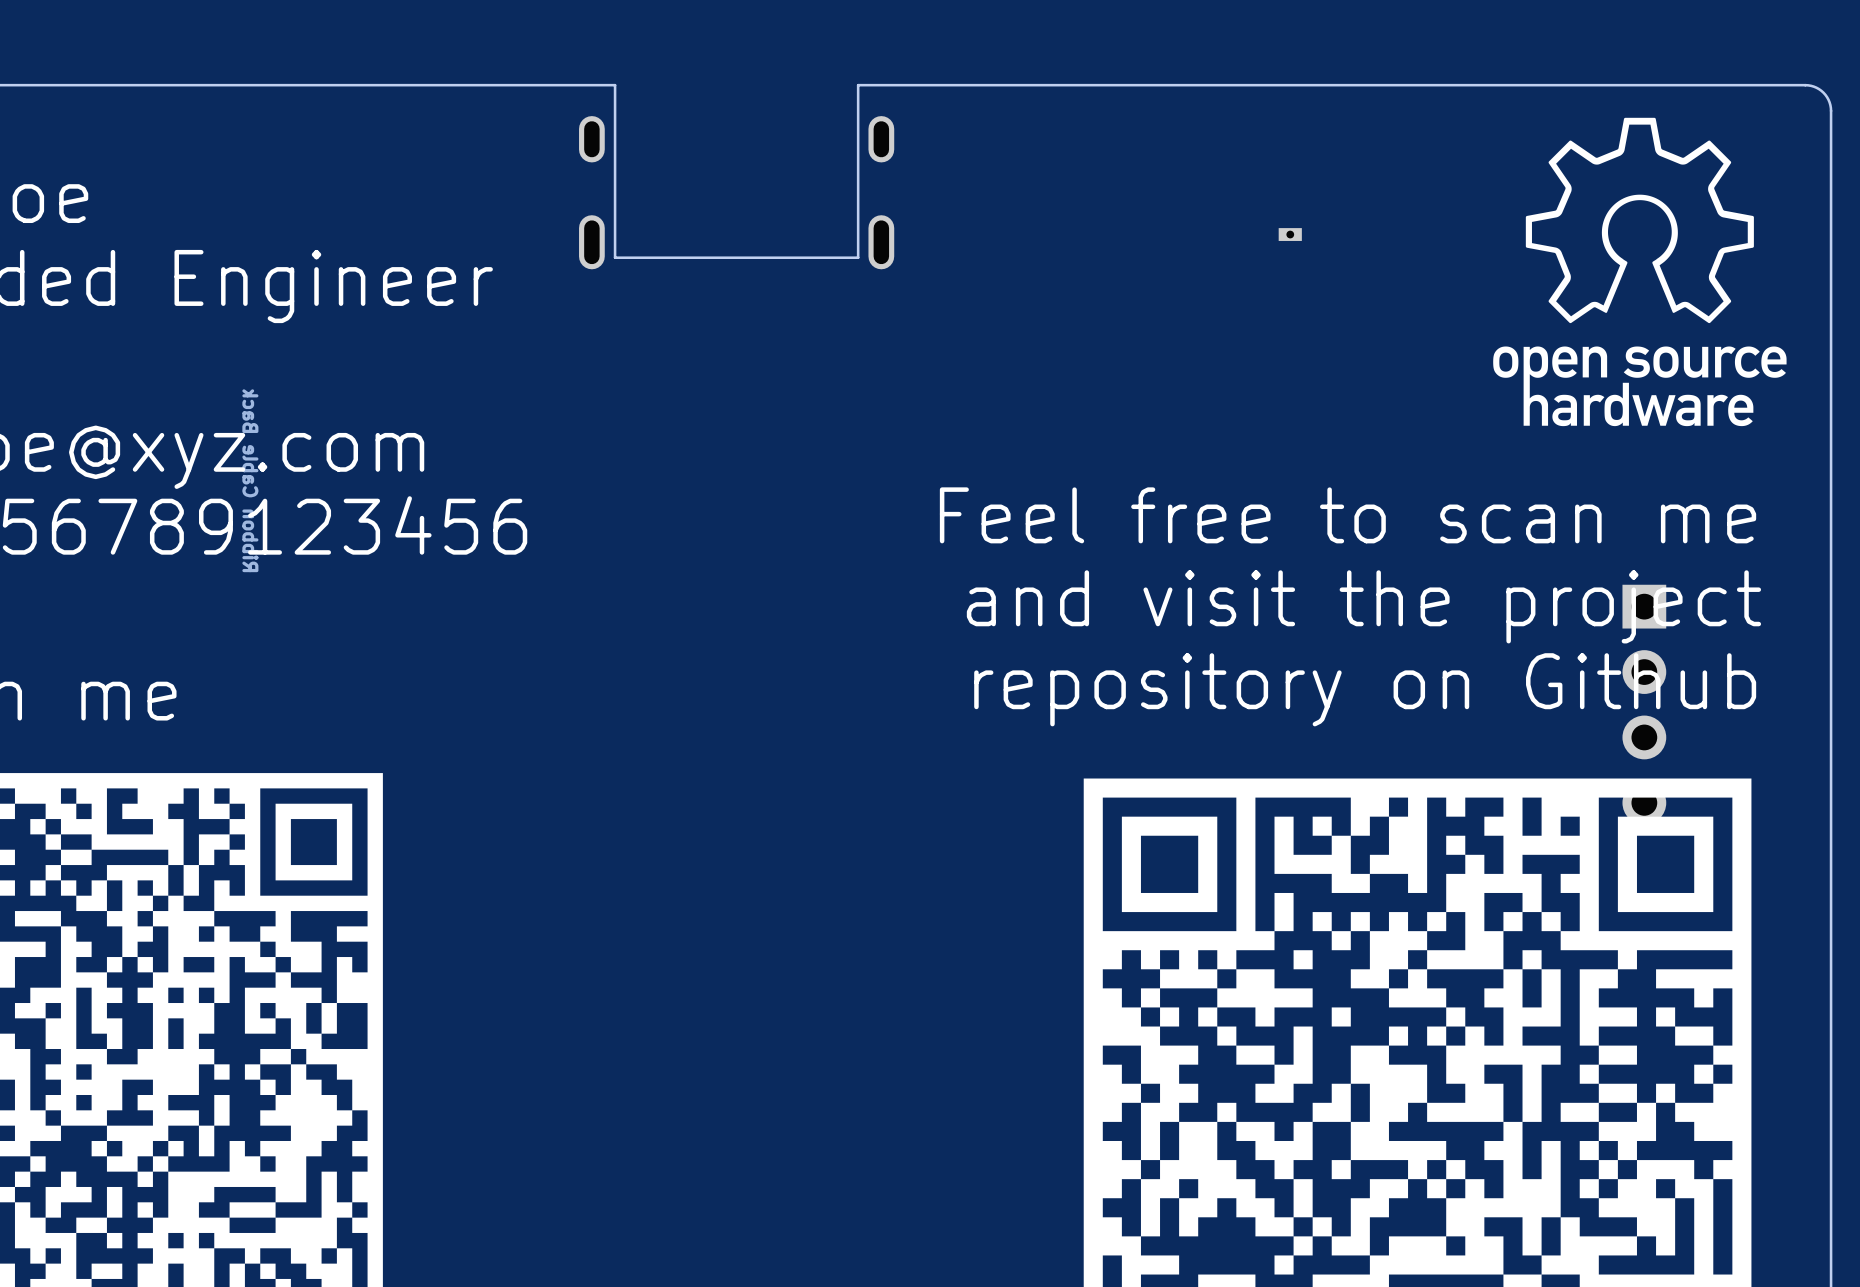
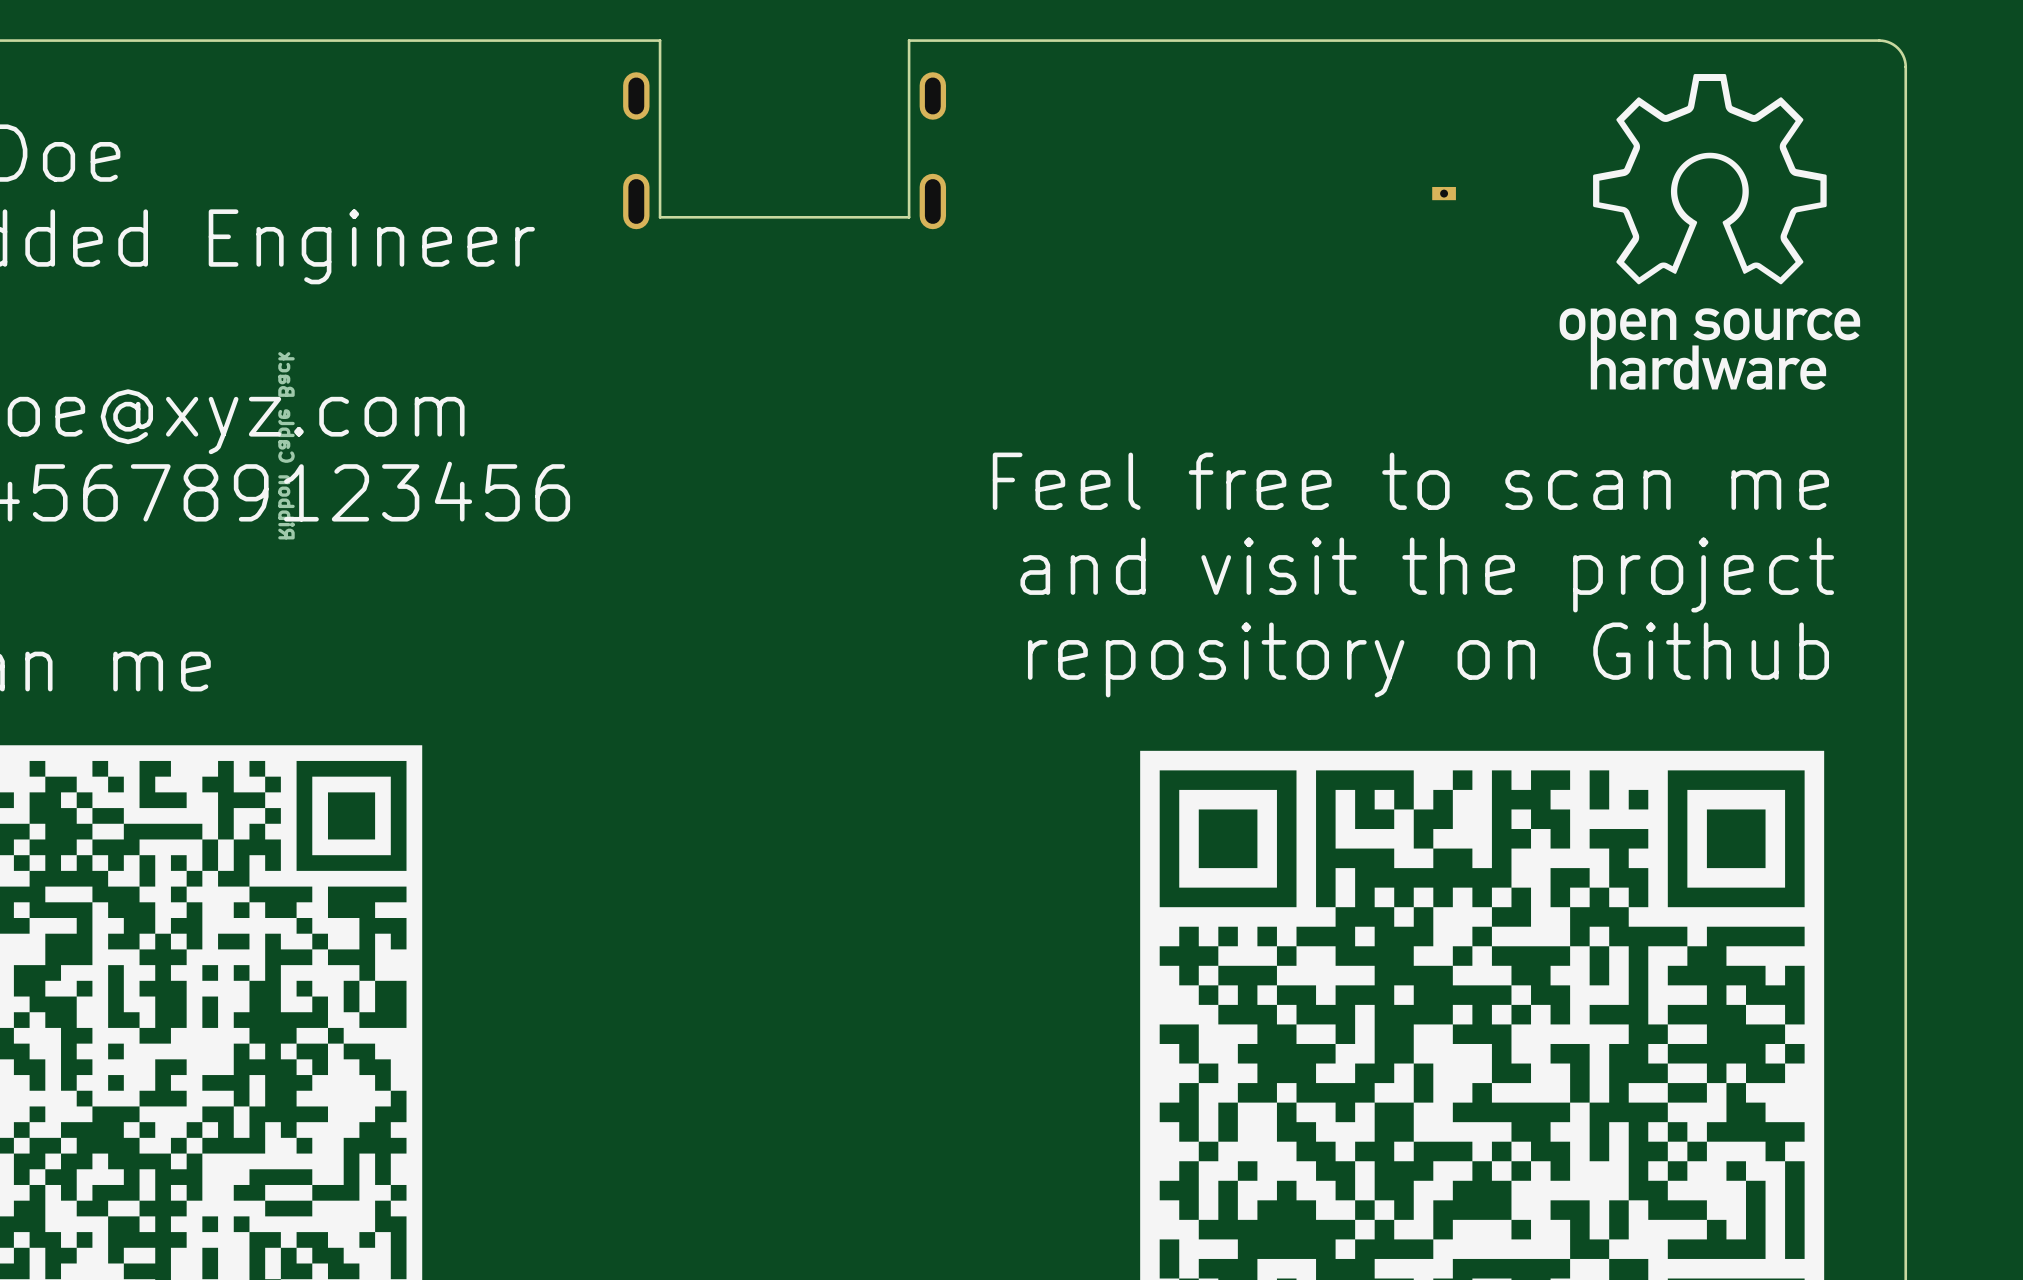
part position: (1290, 234) -> (1444, 193)
part: (1644, 704) -> none

